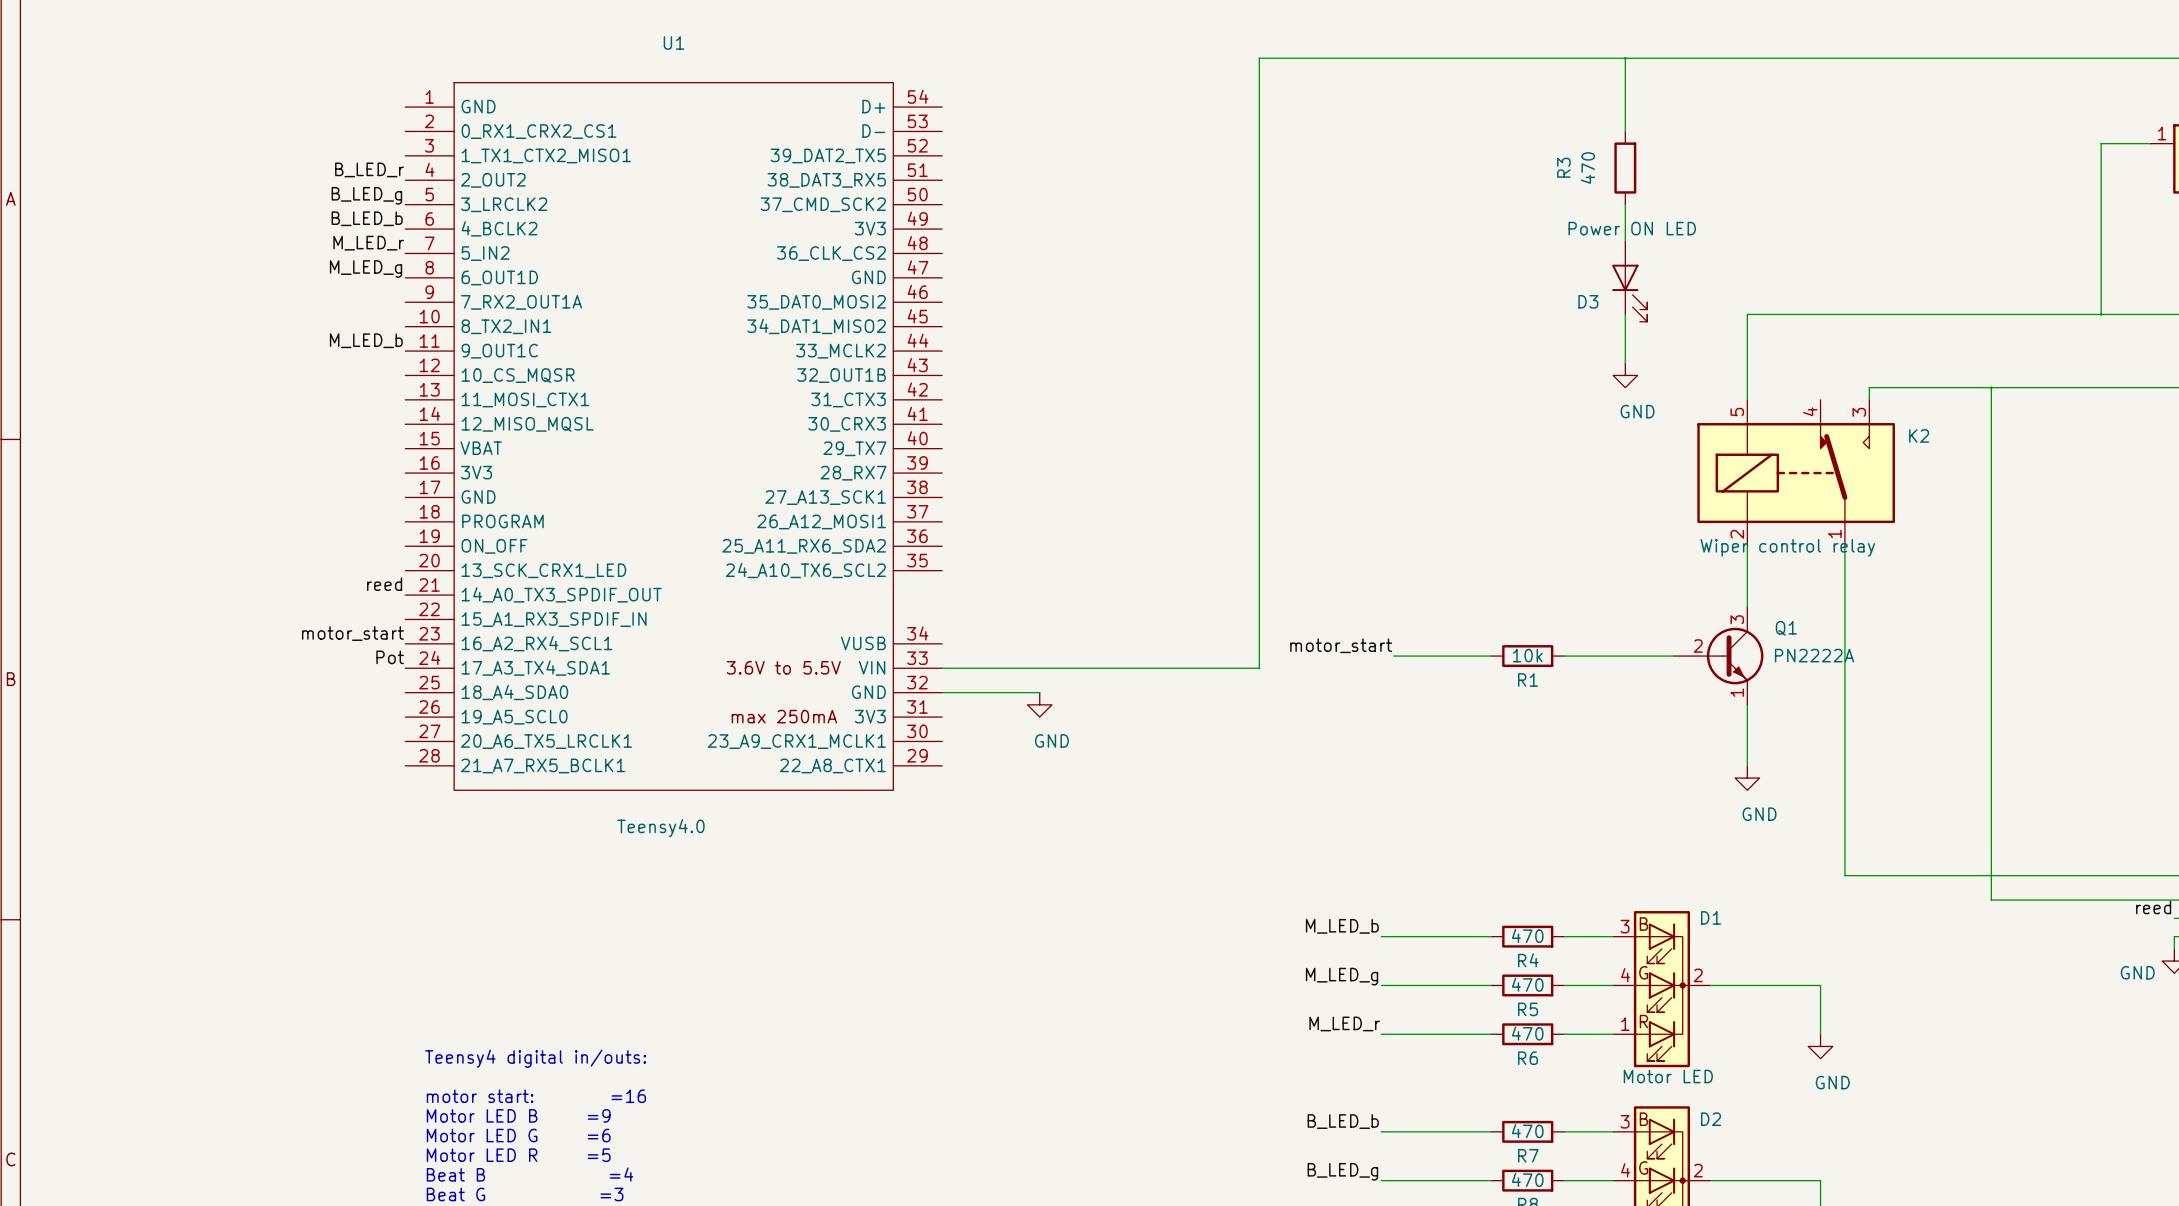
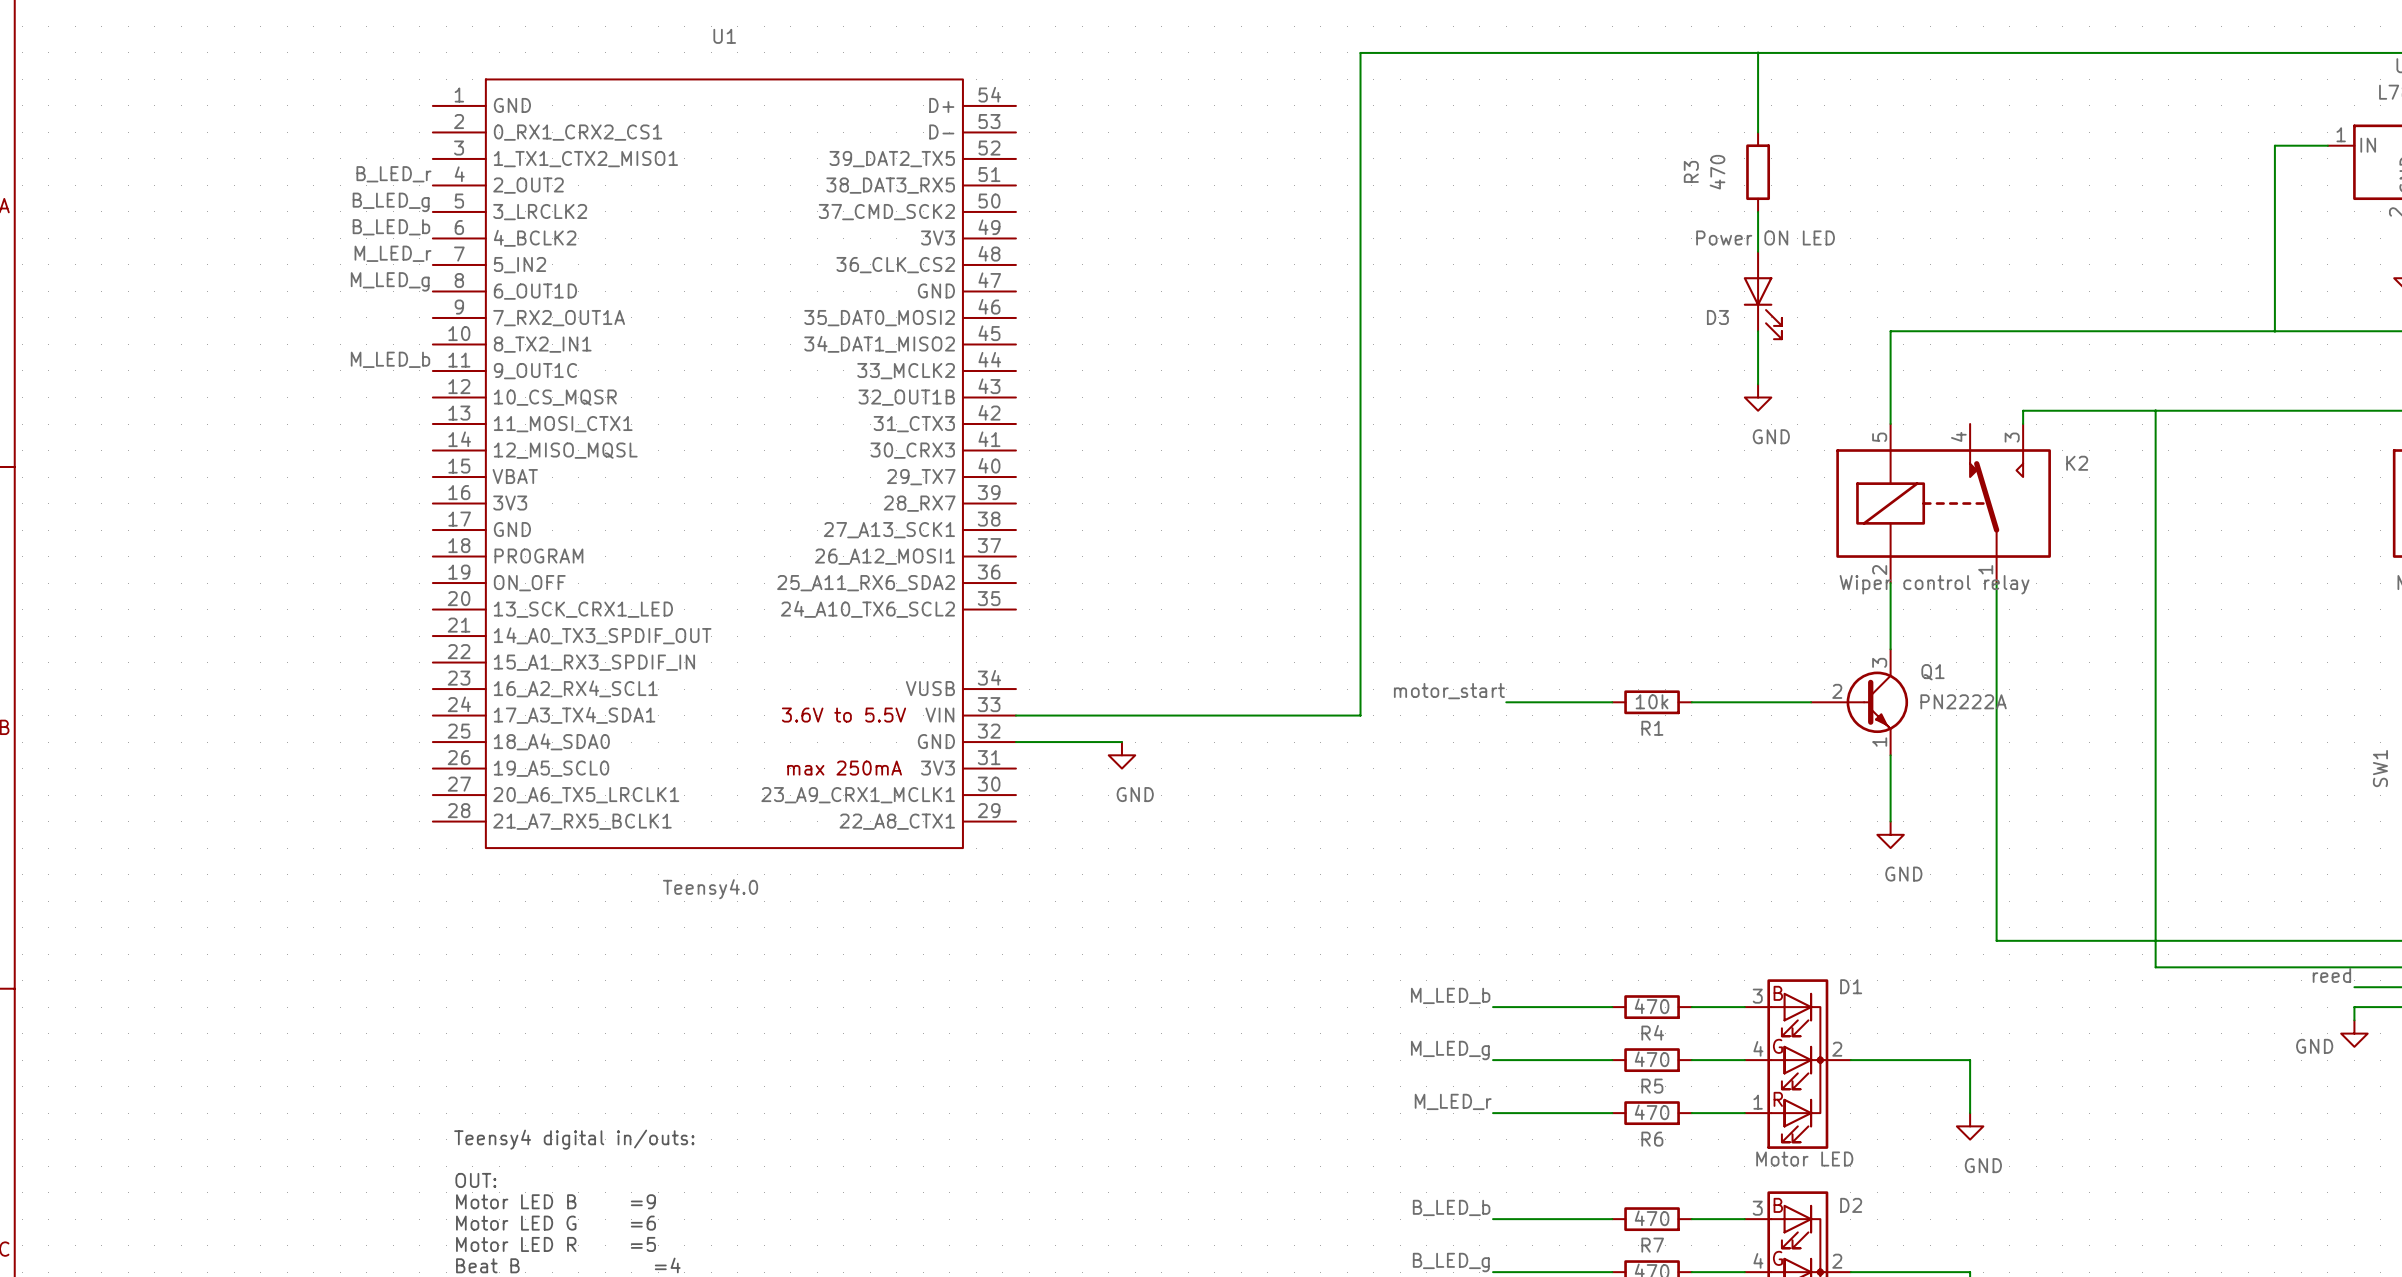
label: reed (384, 584) -> none
label: motor_start (352, 633) -> none
label: Pot (390, 657) -> none
text: motor start: =16 (536, 1096) -> OUT: (475, 1180)

